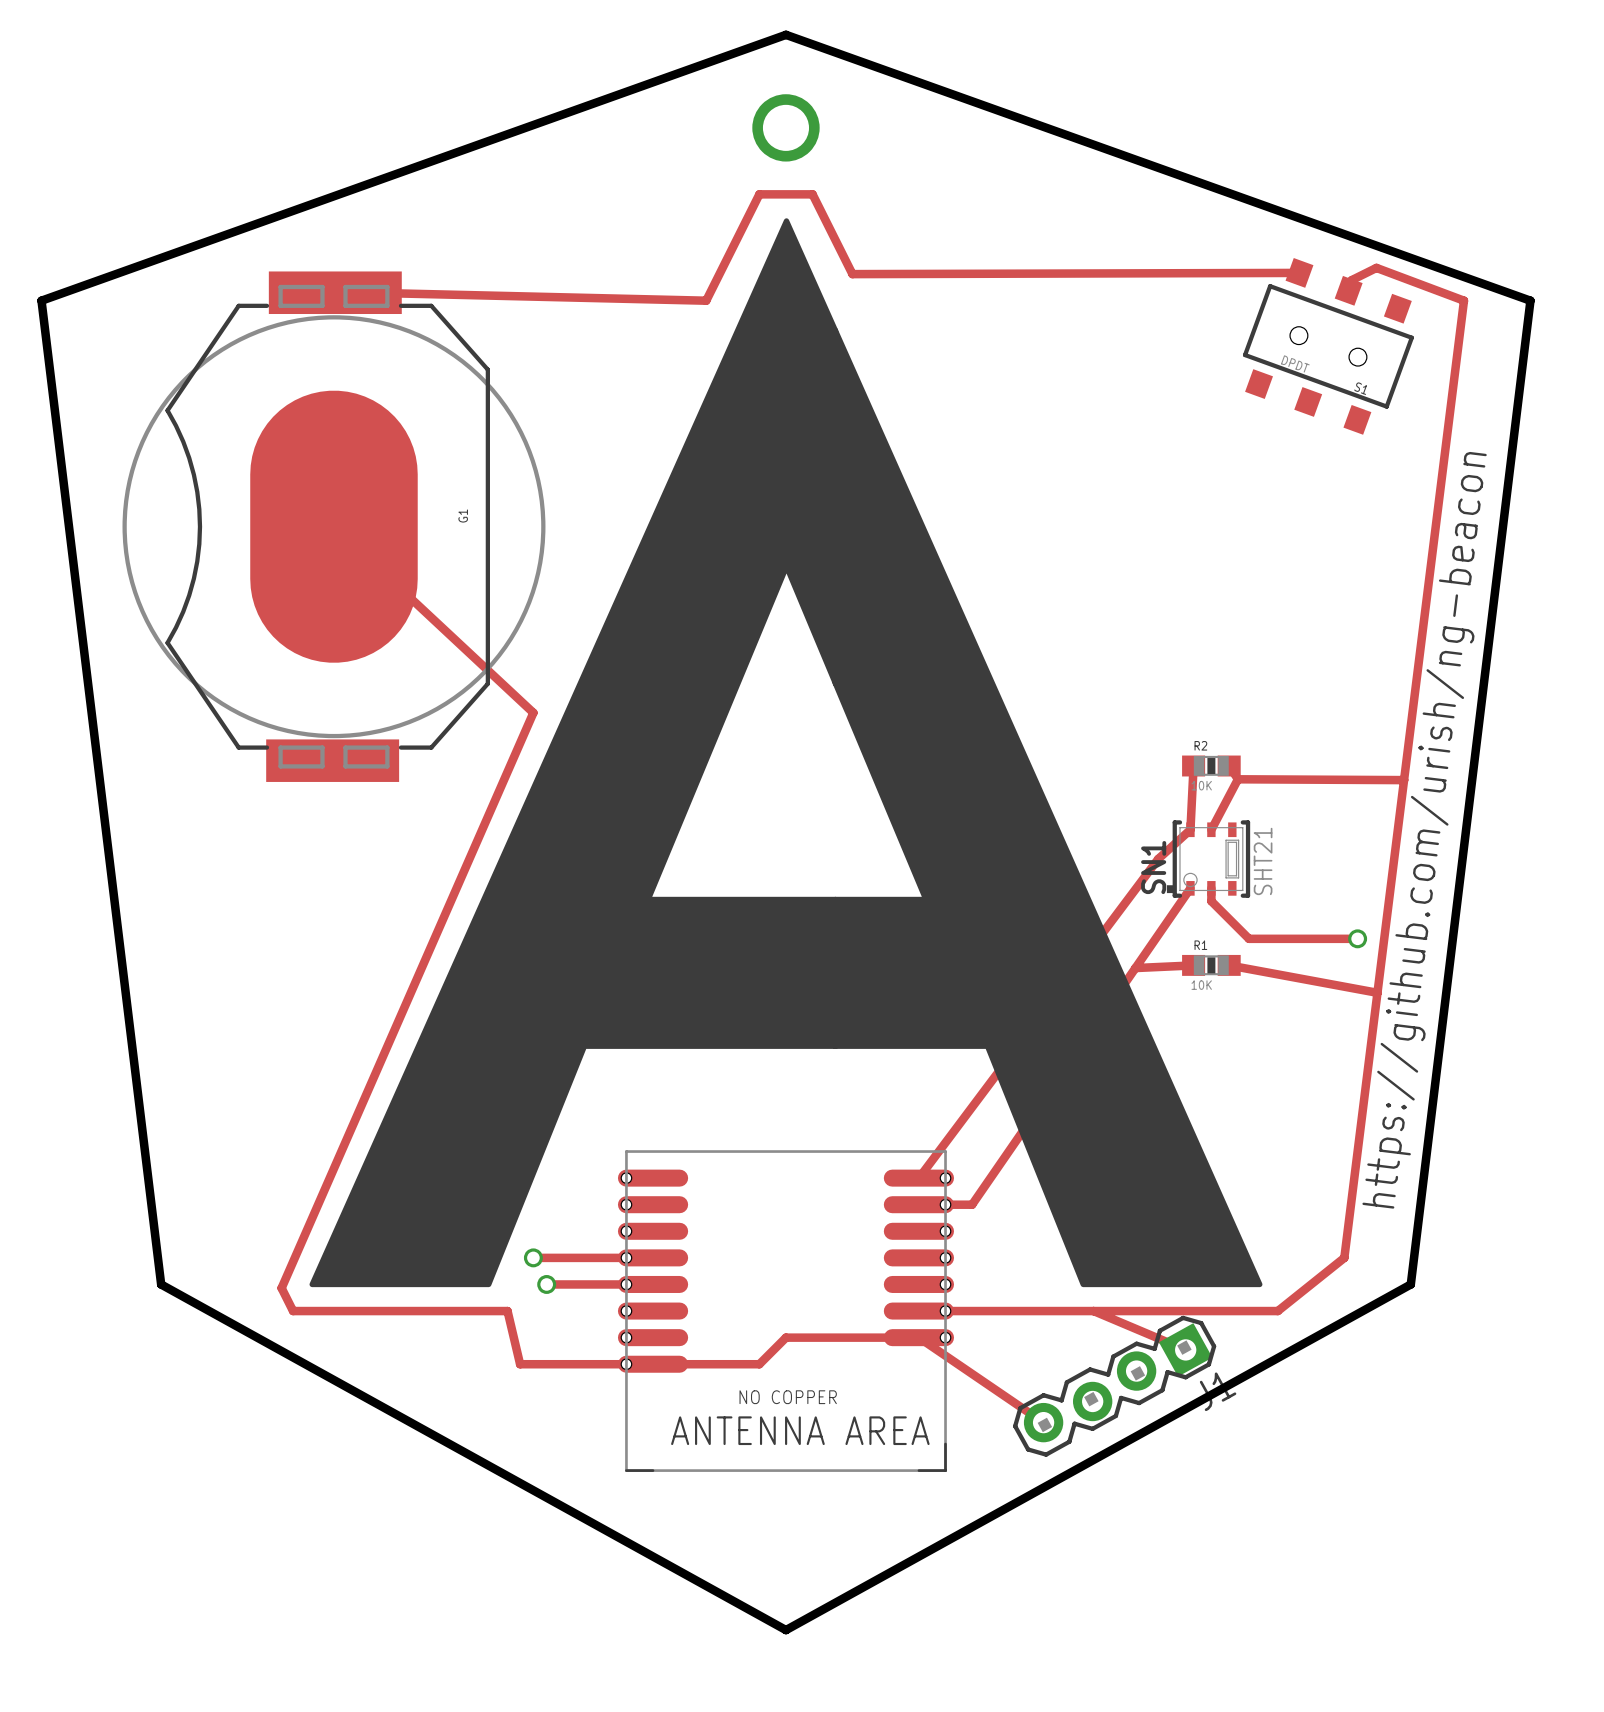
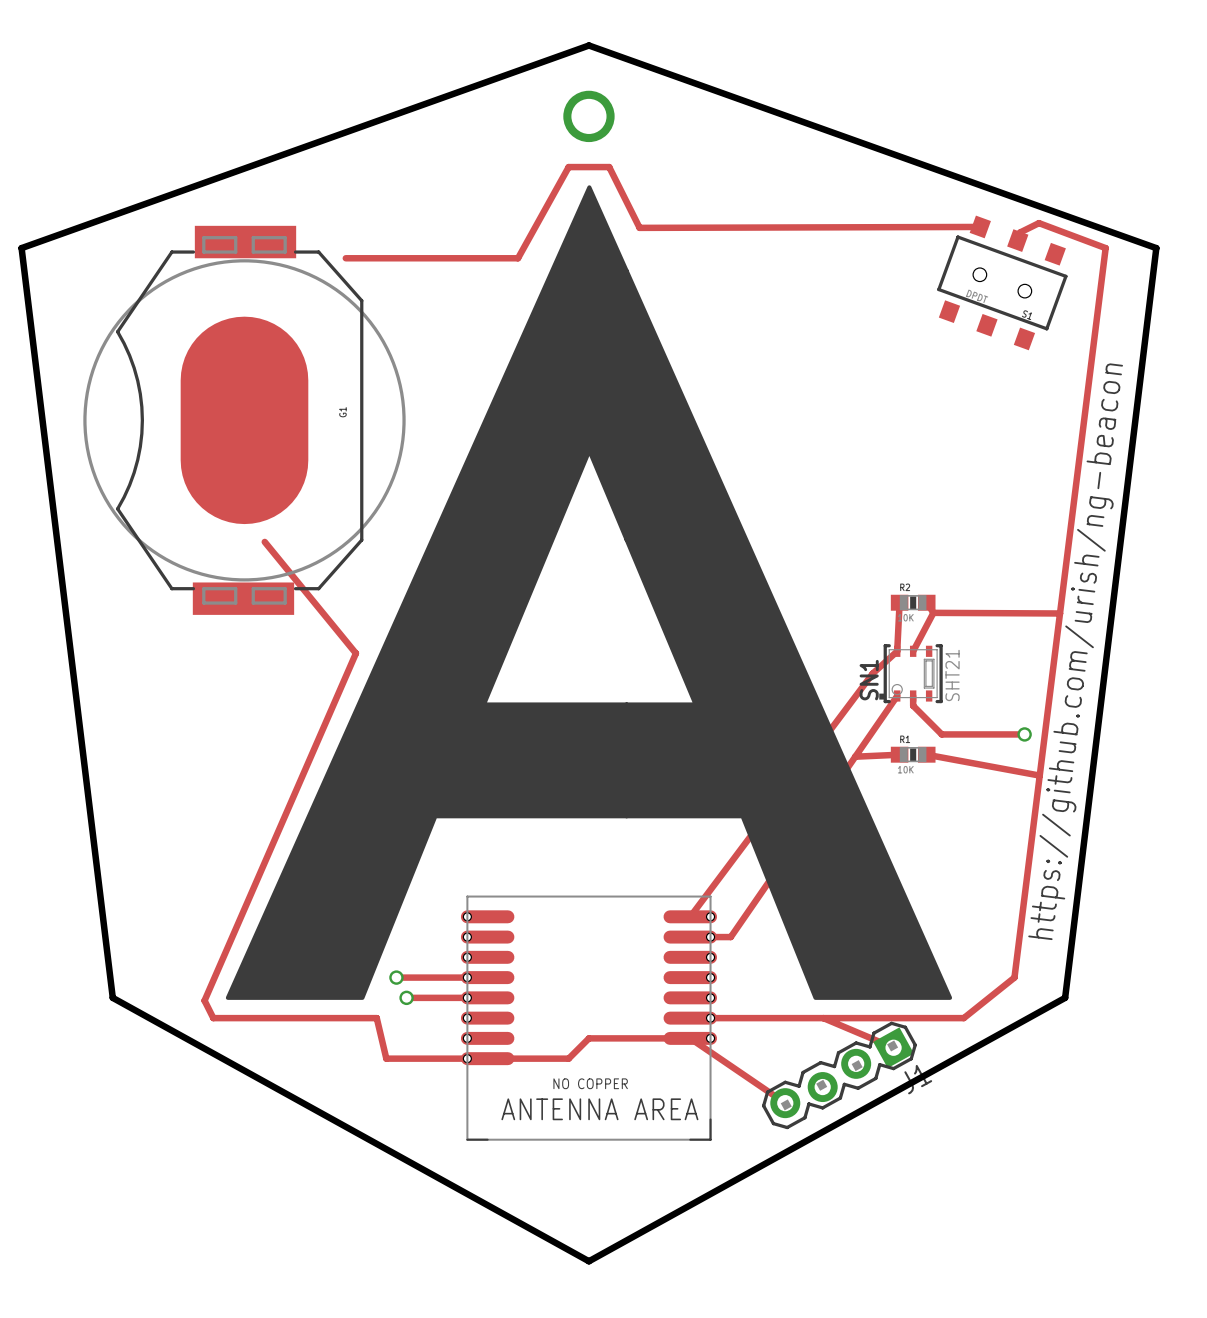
track: (759, 194) (706, 300) (368, 292) -> (568, 167) (518, 258) (345, 258)
track: (333, 526) (533, 712) (281, 1288) -> (264, 541) (355, 653) (204, 1000)

